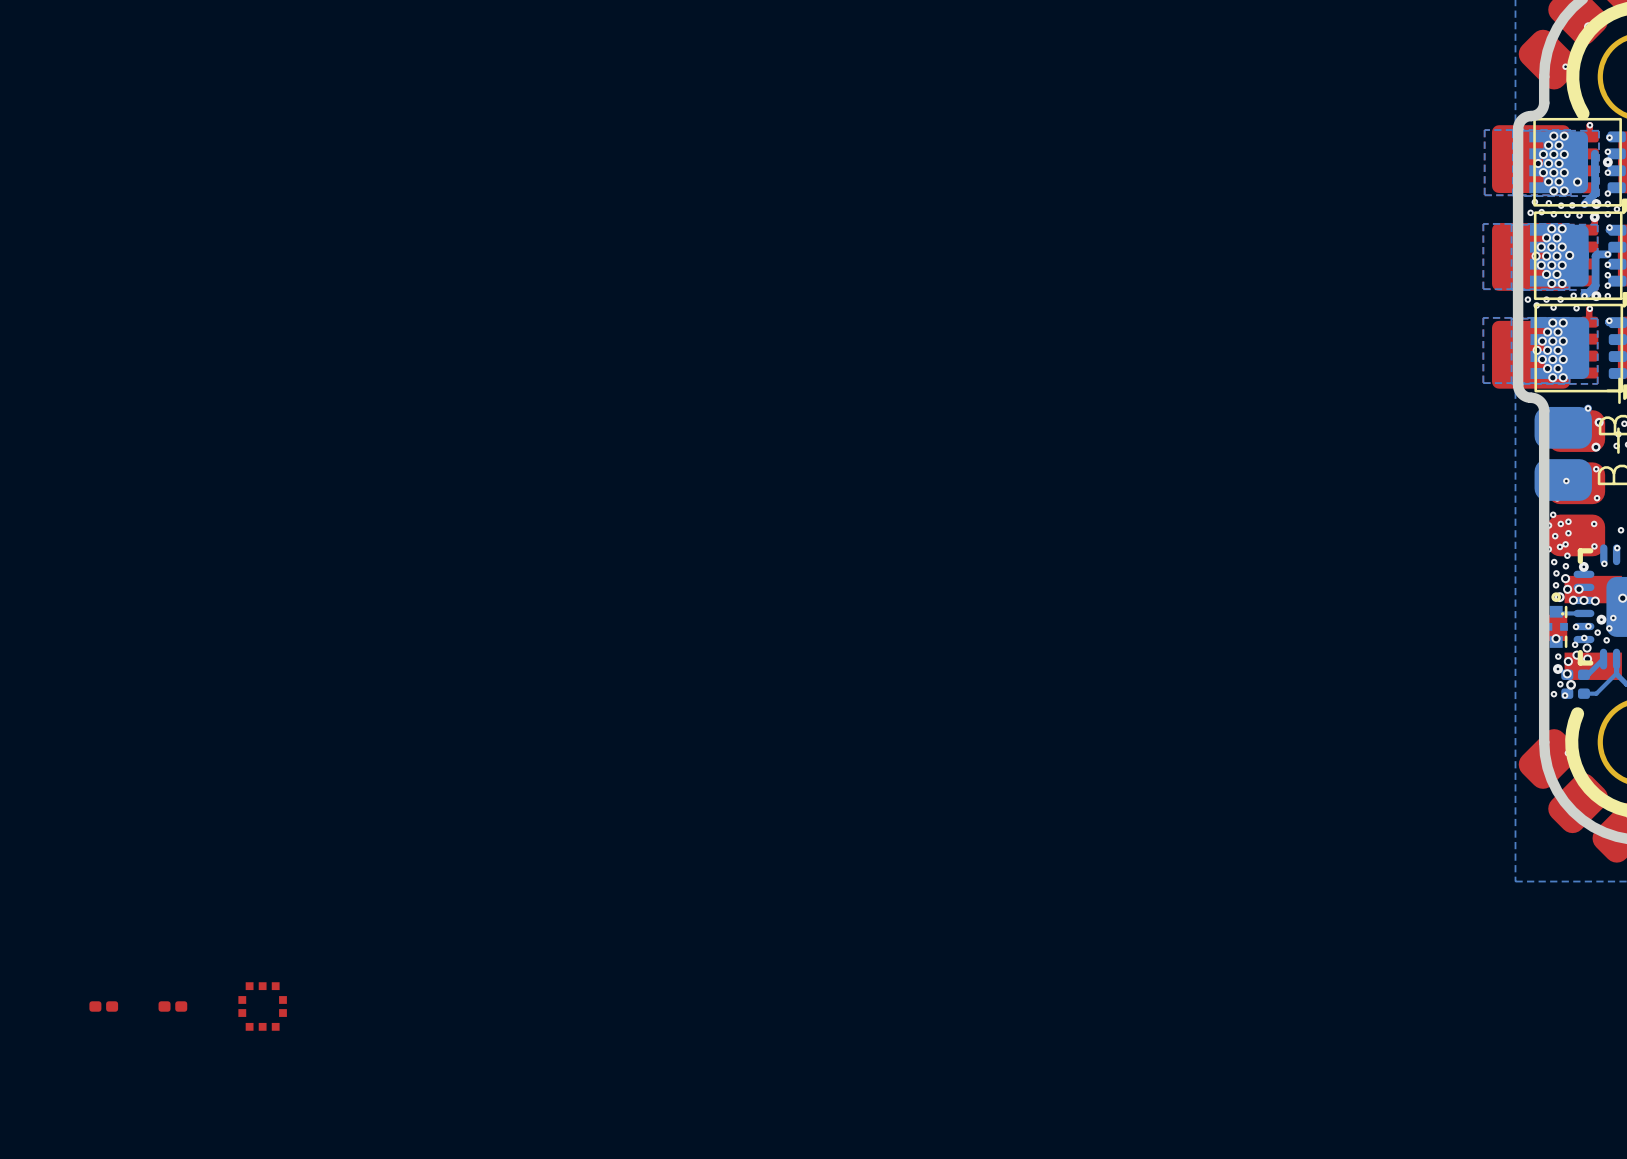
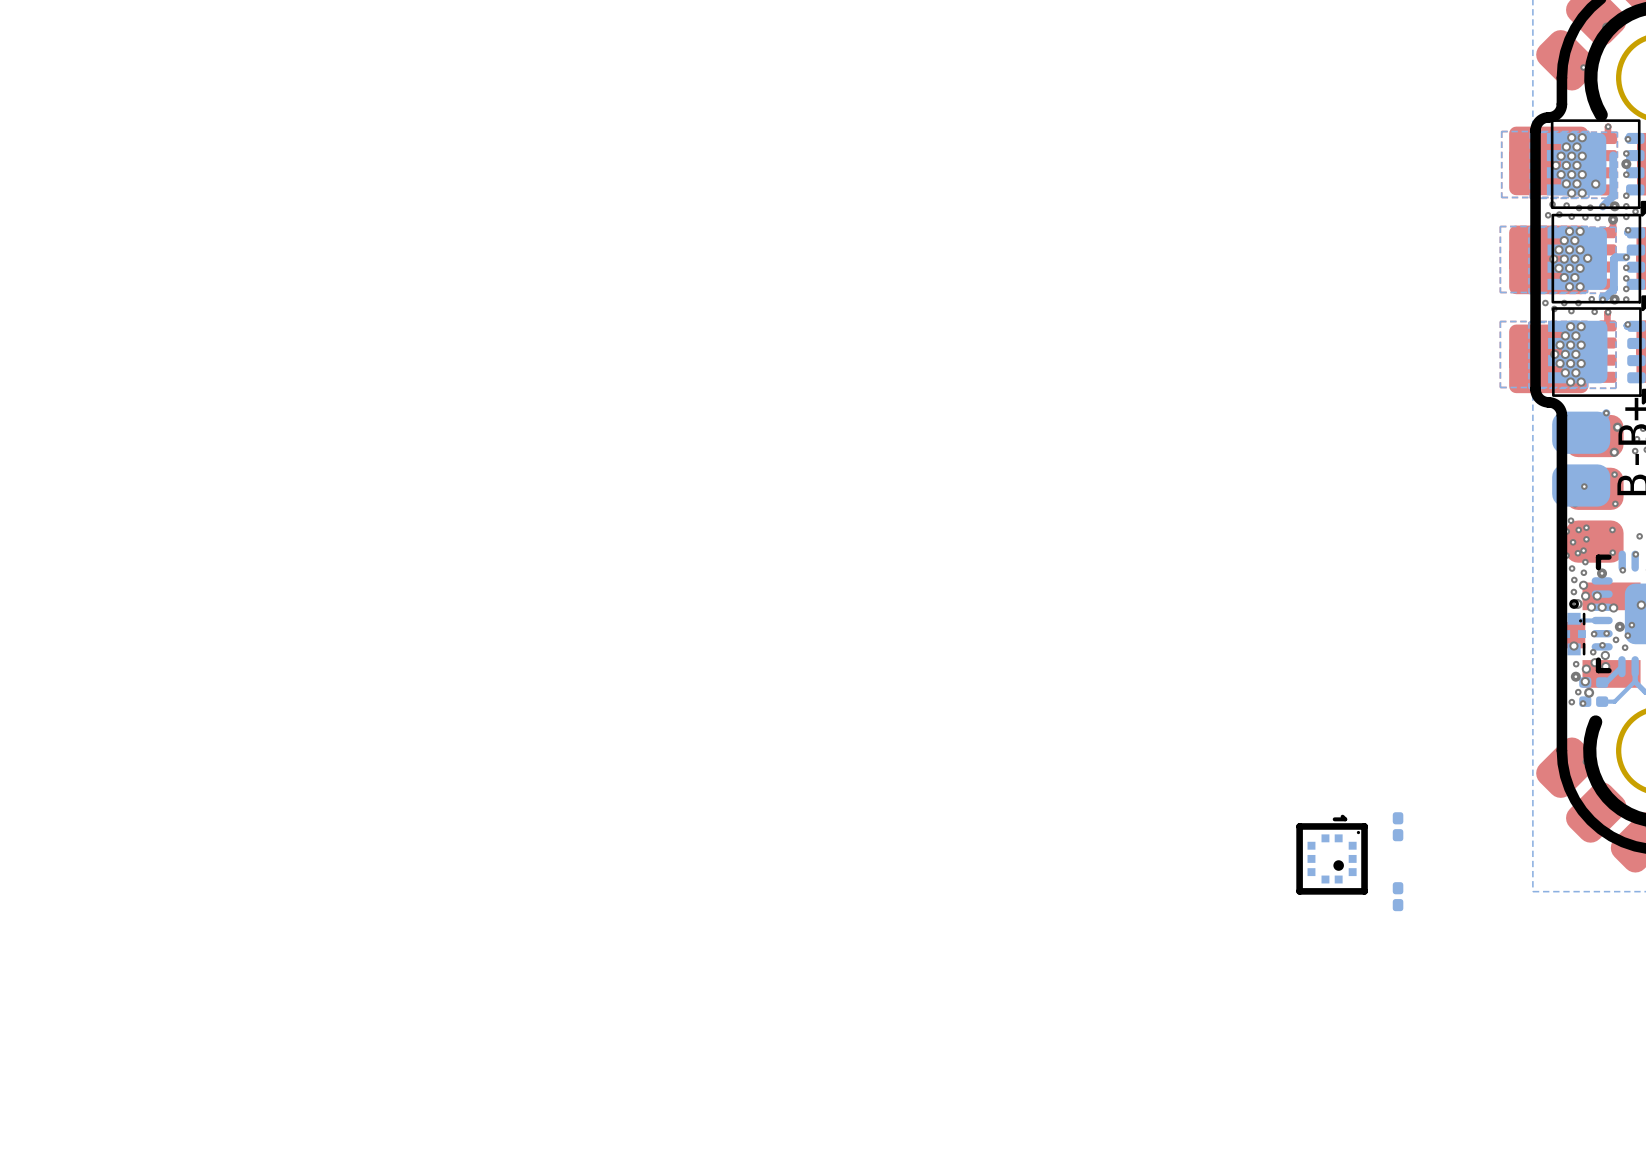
part: none -> (1398, 826)
part: none -> (1332, 854)
part: none -> (1398, 896)
part: (103, 1006) -> none
part: (172, 1006) -> none
part: (262, 1006) -> none

